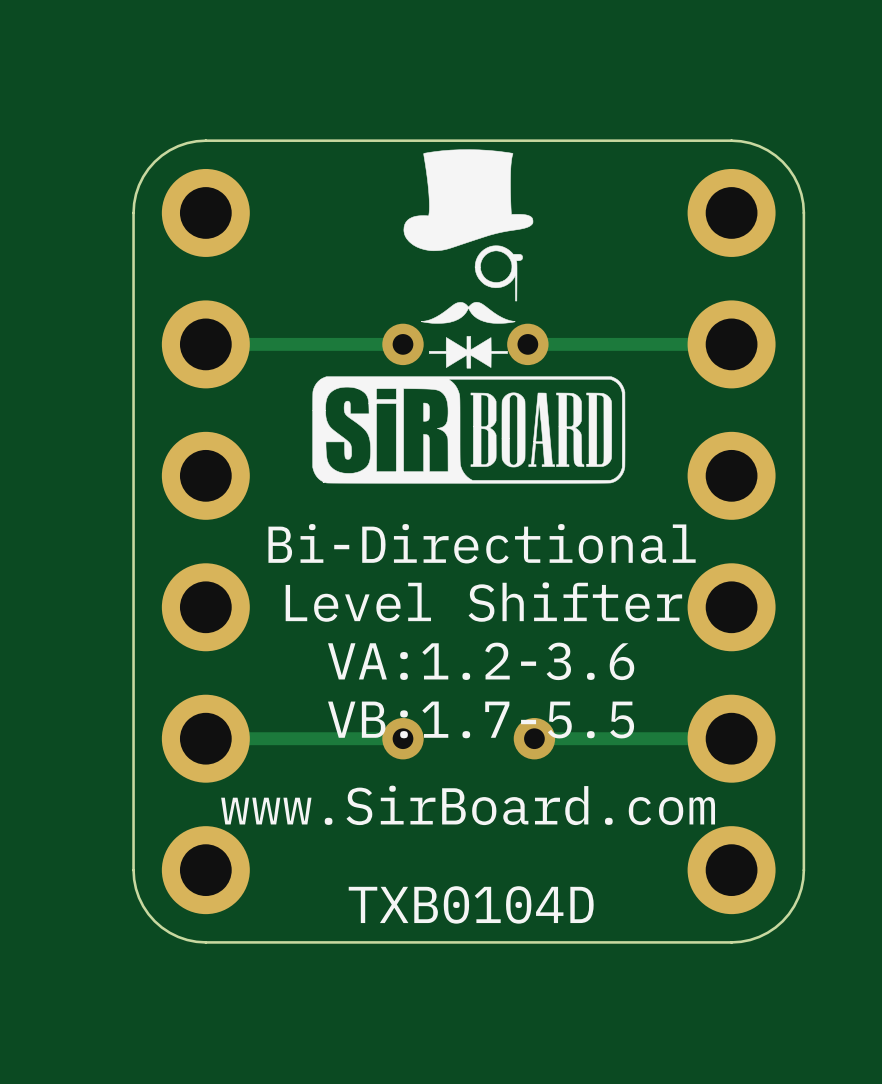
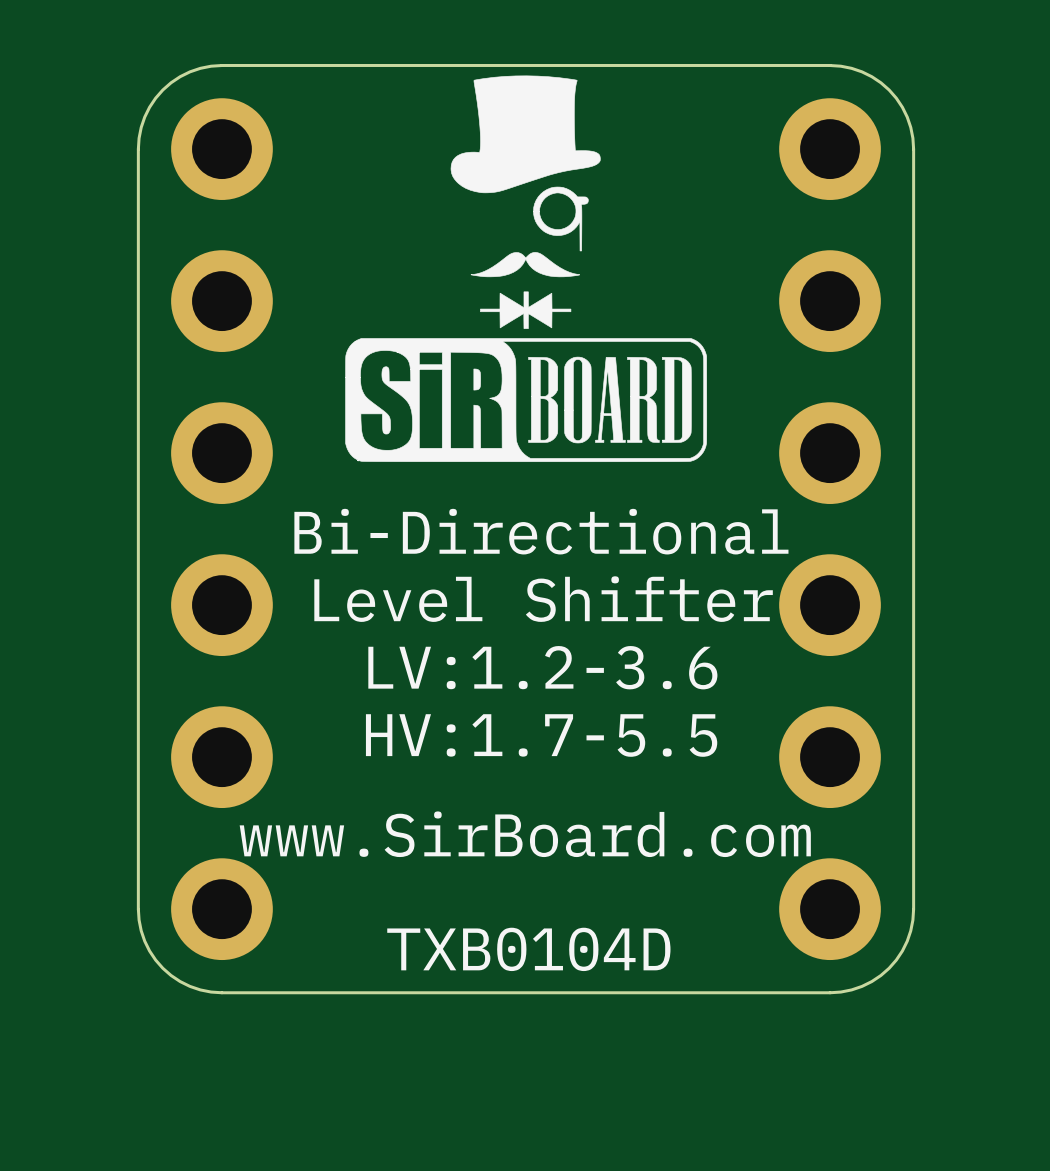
track: (402, 344) (205, 344) -> none
via: (402, 344) -> none
via: (527, 344) -> none
track: (731, 344) (527, 344) -> none
text: VA:1.2-3.6 (481, 661) -> LV:1.2-3.6 (542, 667)
text: VB:1.7-5.5 (481, 719) -> HV:1.7-5.5 (541, 735)
track: (402, 738) (205, 738) -> none
via: (402, 738) -> none
via: (534, 738) -> none
track: (731, 738) (534, 738) -> none

